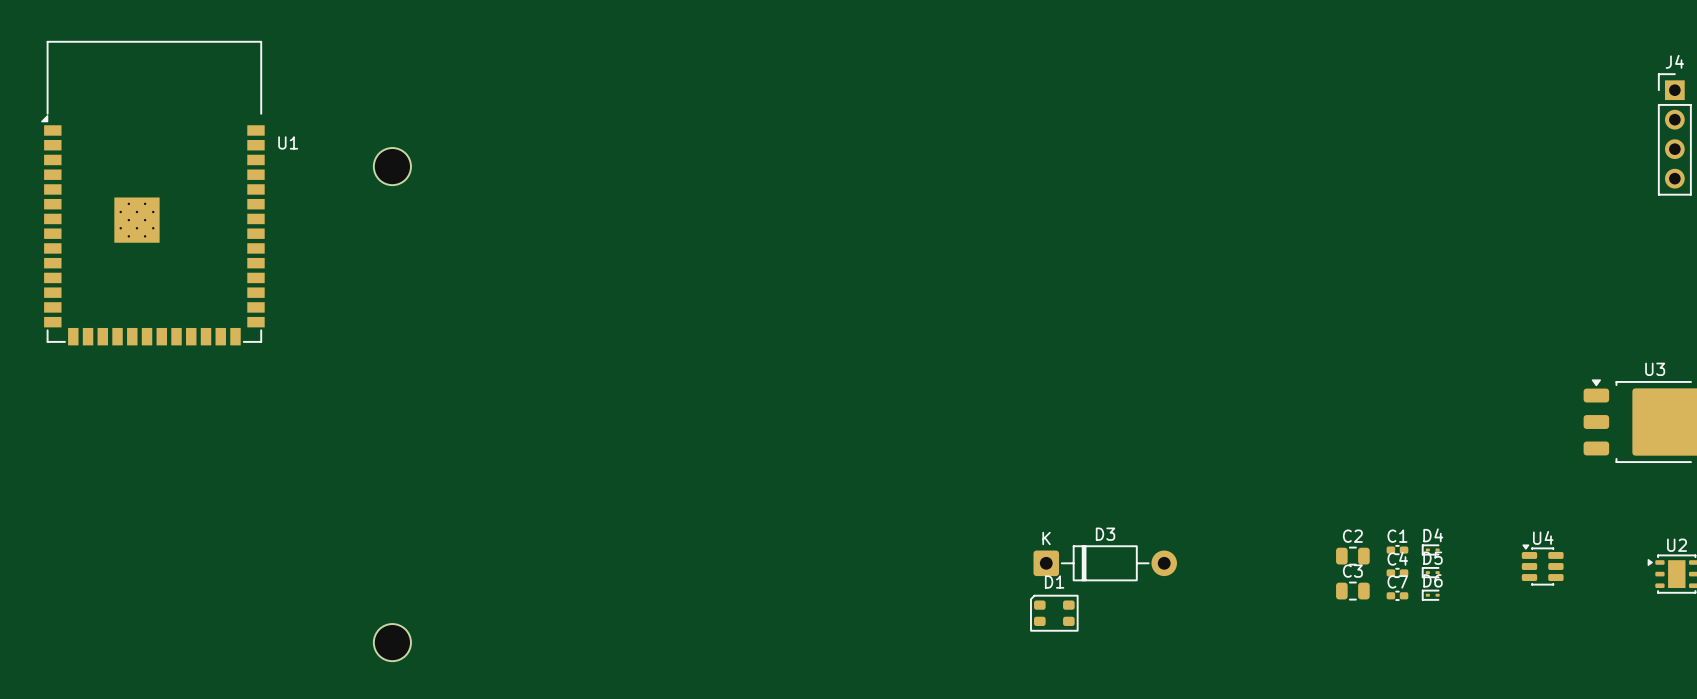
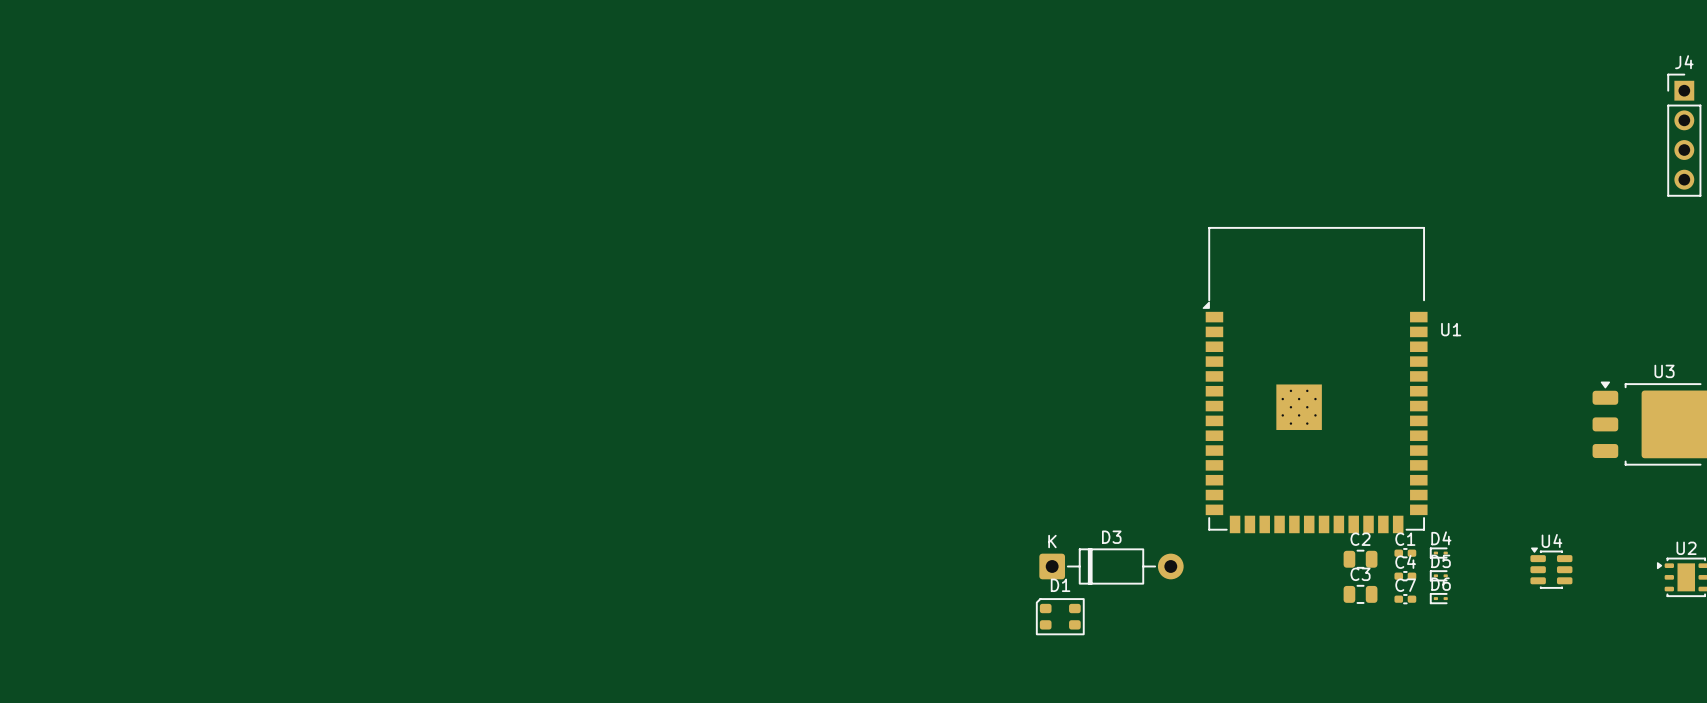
part: (392, 166) -> none
U1 position: (152, 193) -> (1315, 380)
part: (392, 642) -> none

